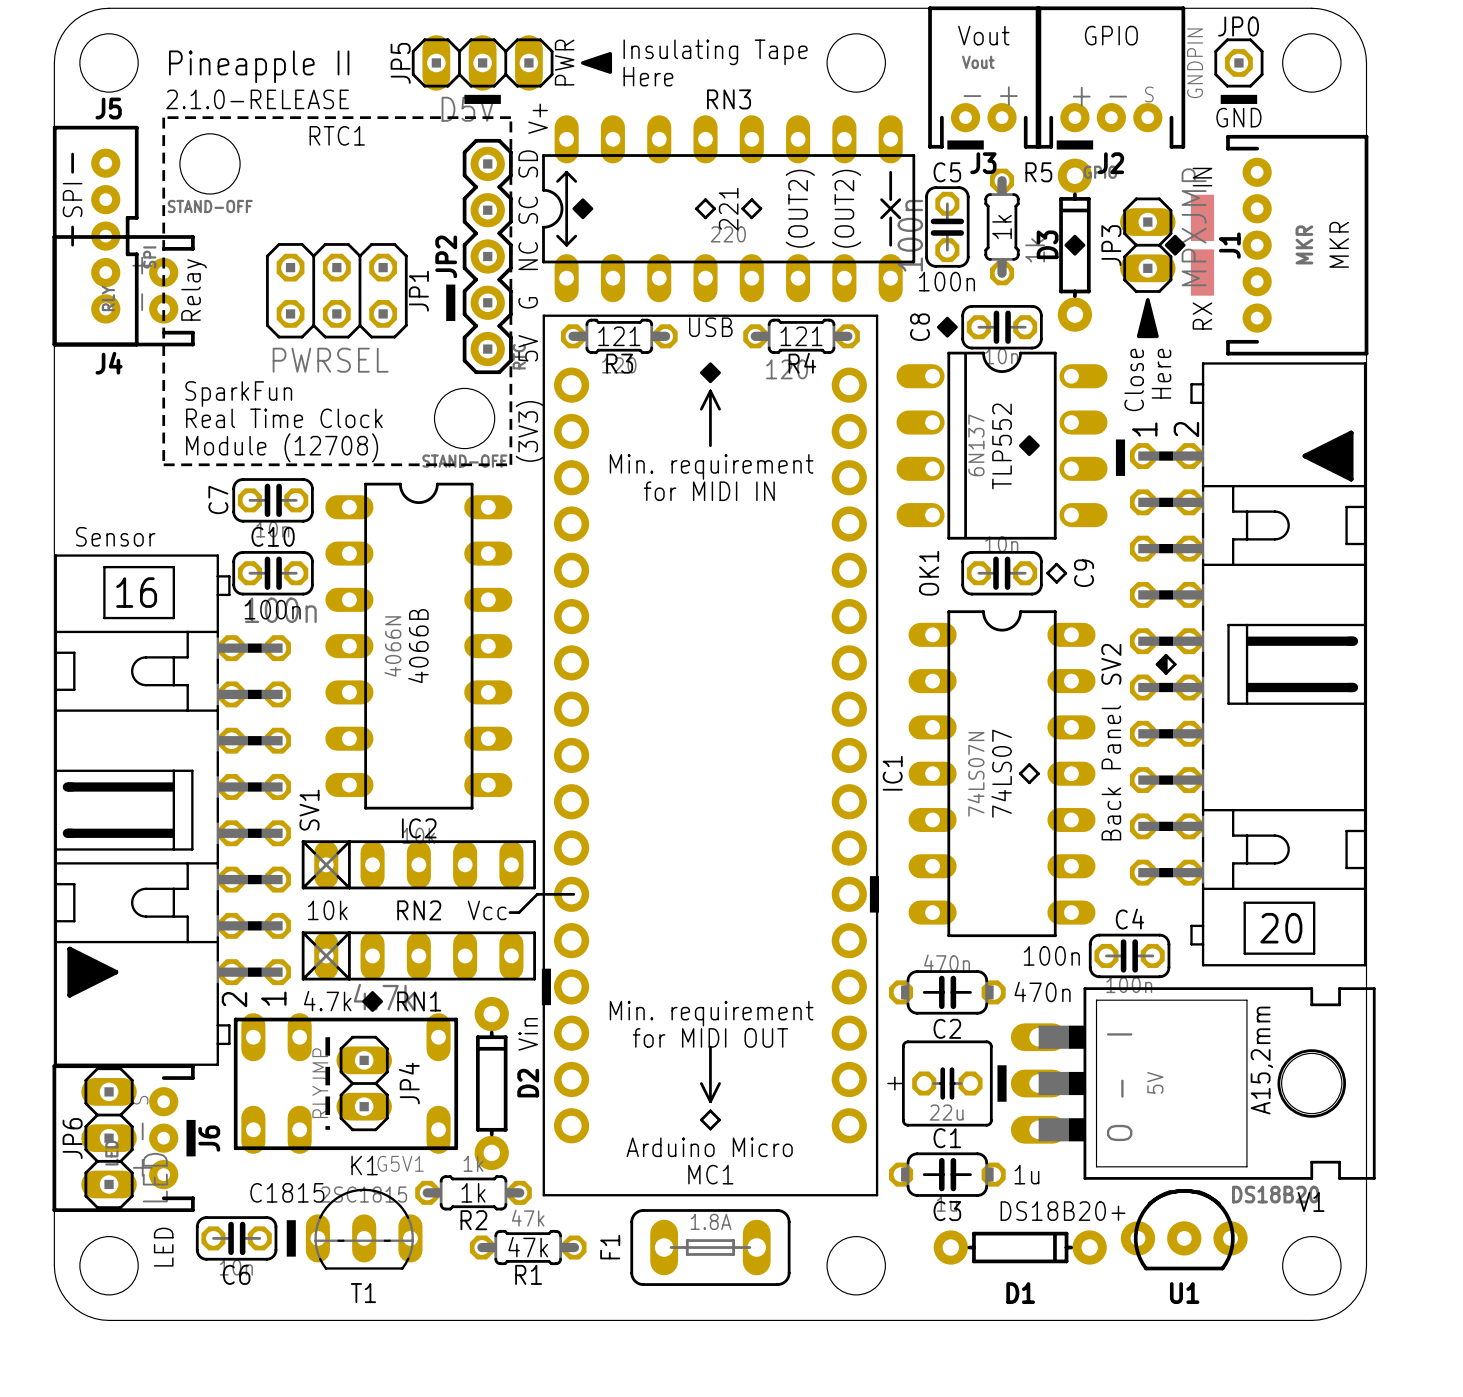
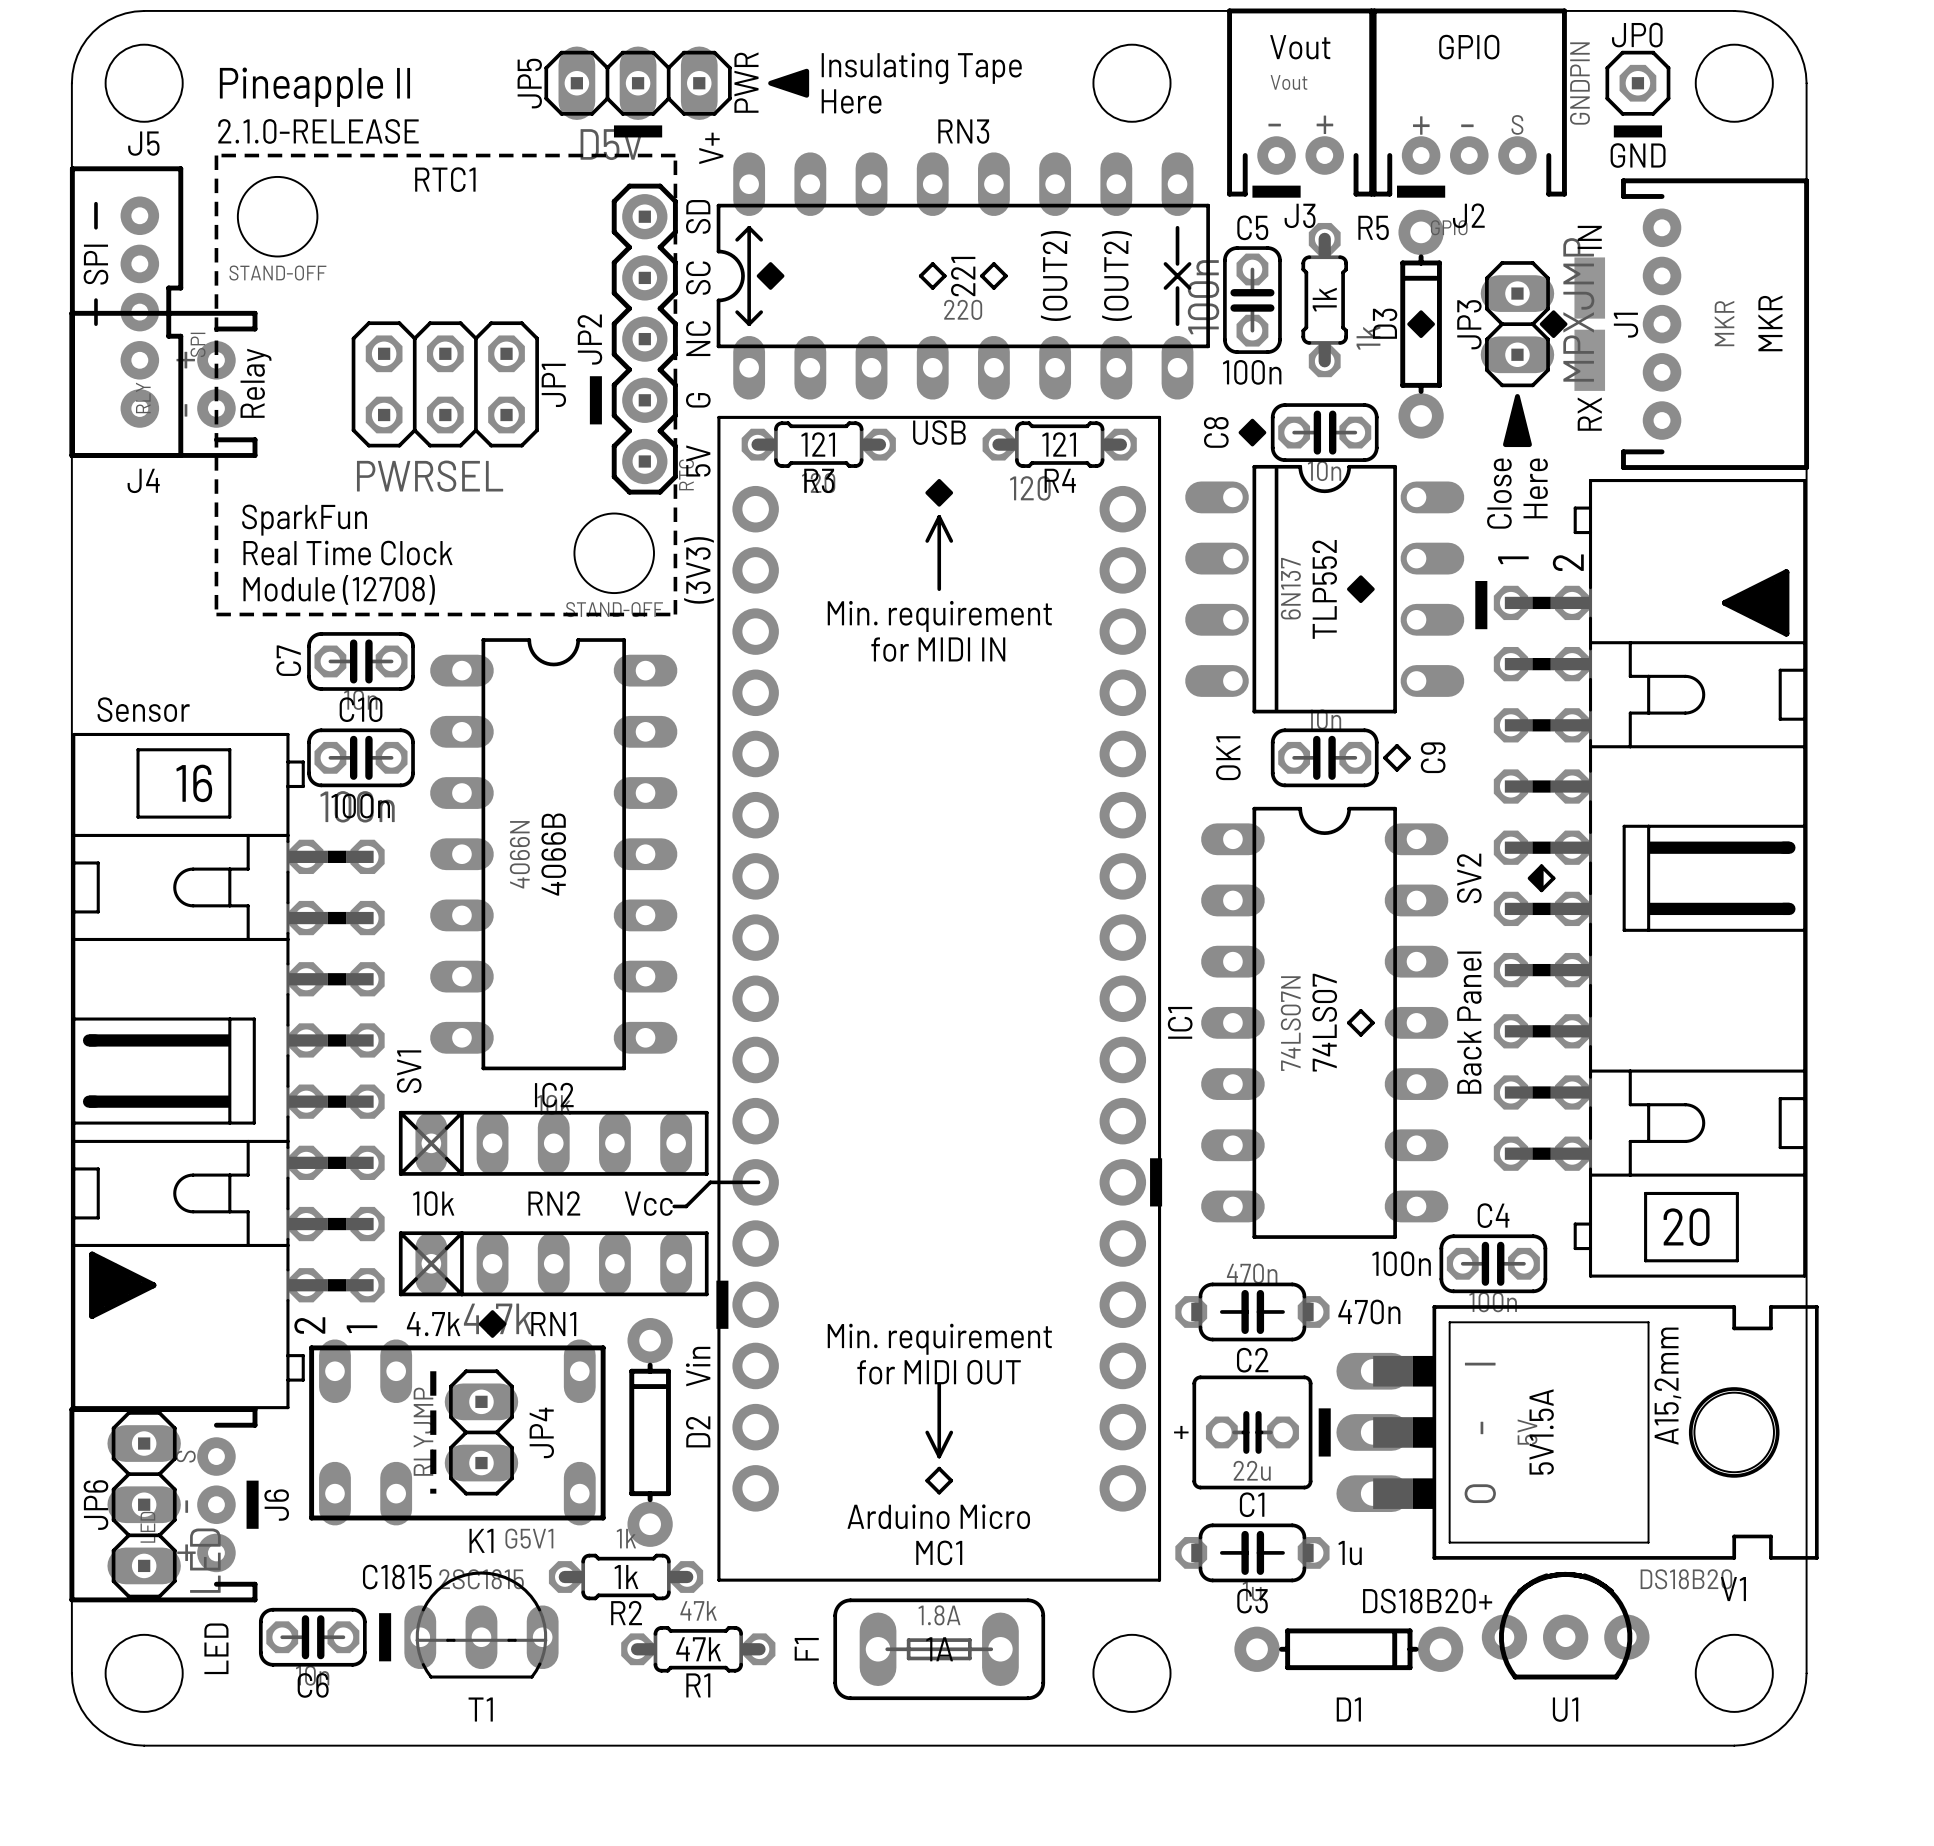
text: none -> 5V1.5A (1541, 1431)
text: none -> 1A (939, 1649)

